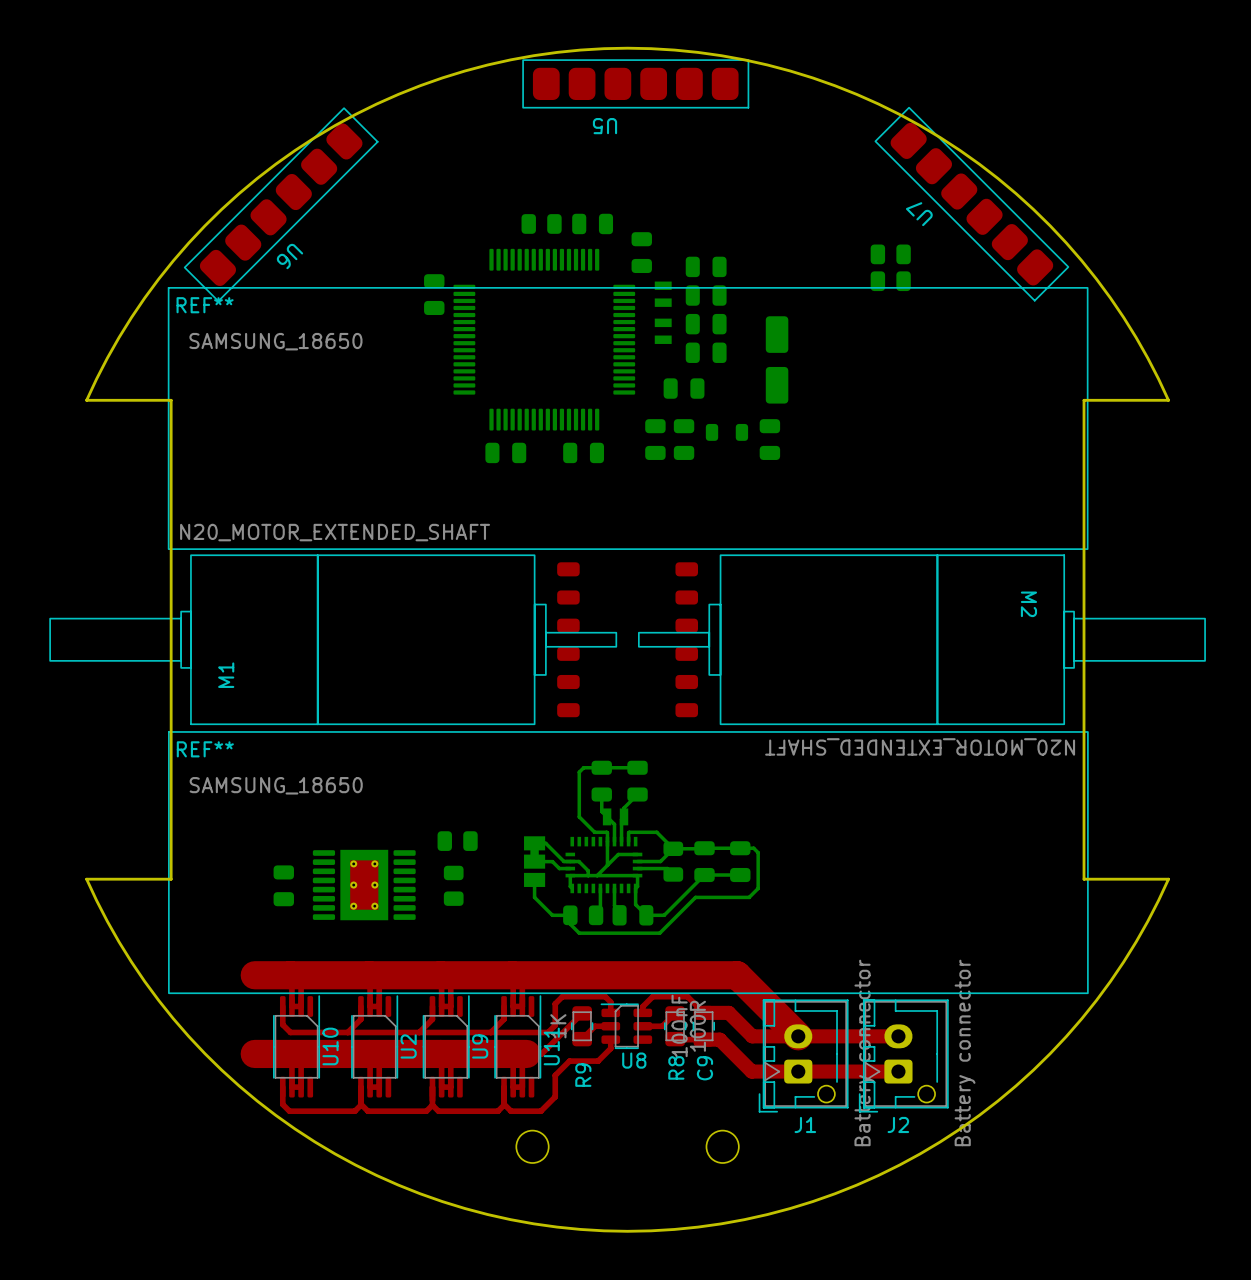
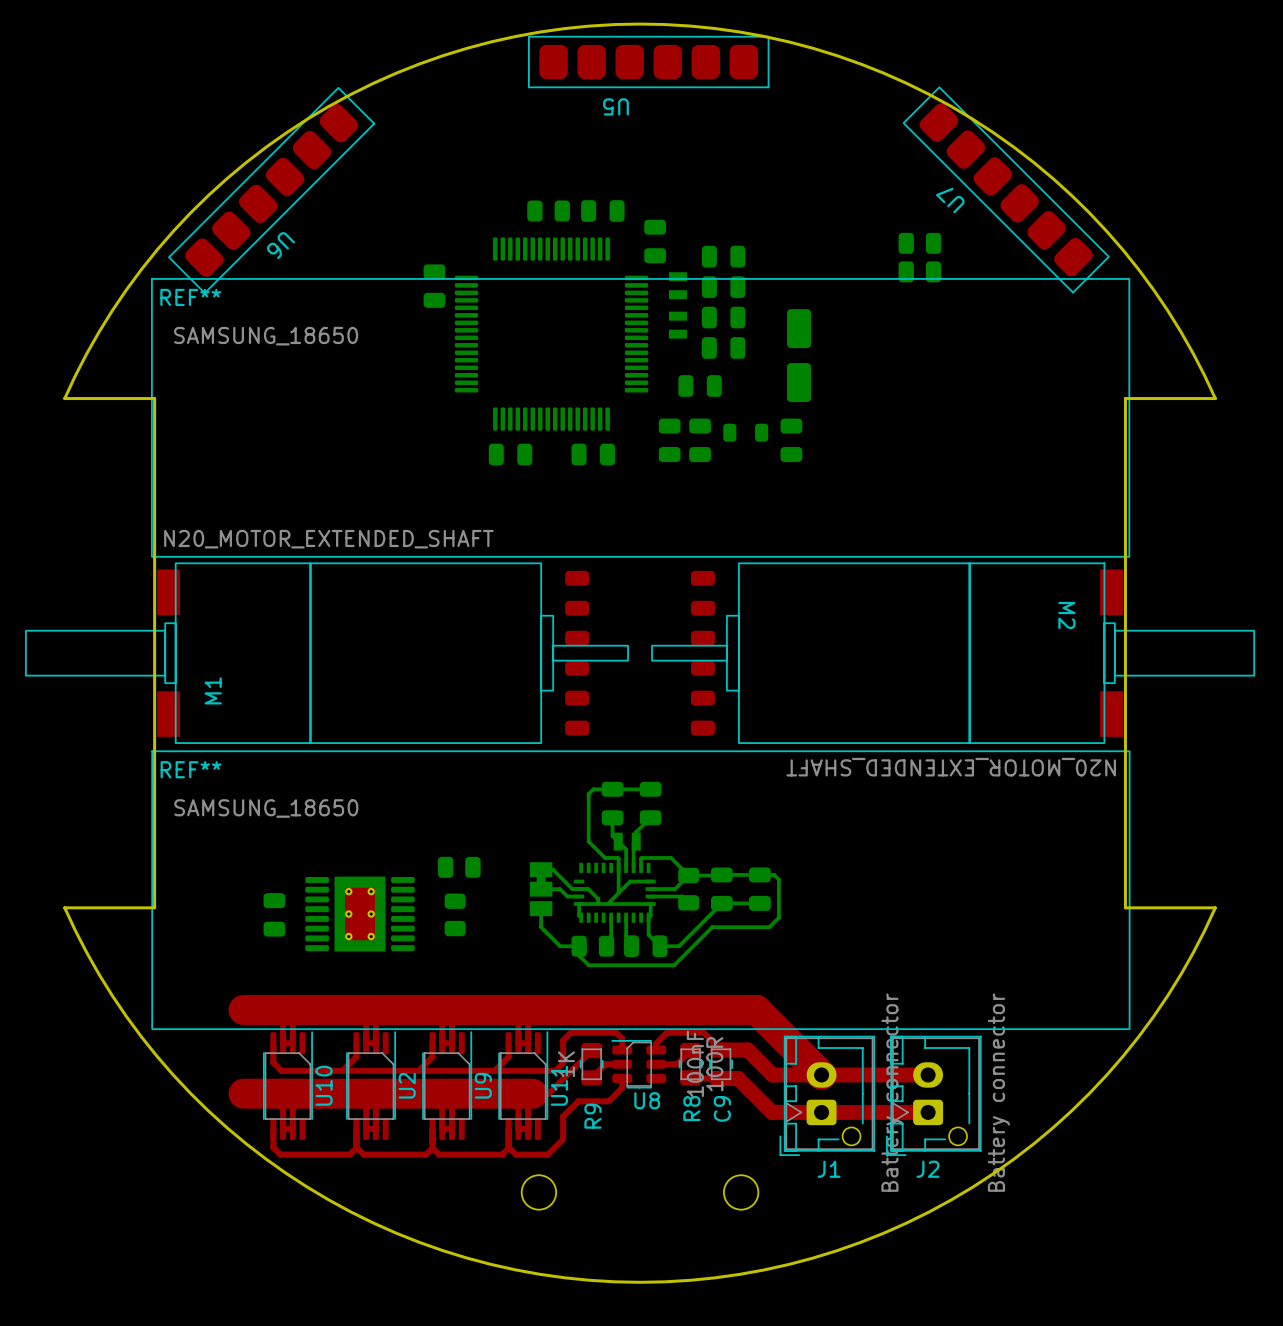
M1 footprint: [49, 554, 618, 726] -> [24, 562, 629, 744]
M2 footprint: [638, 554, 1206, 726] -> [651, 562, 1256, 744]

